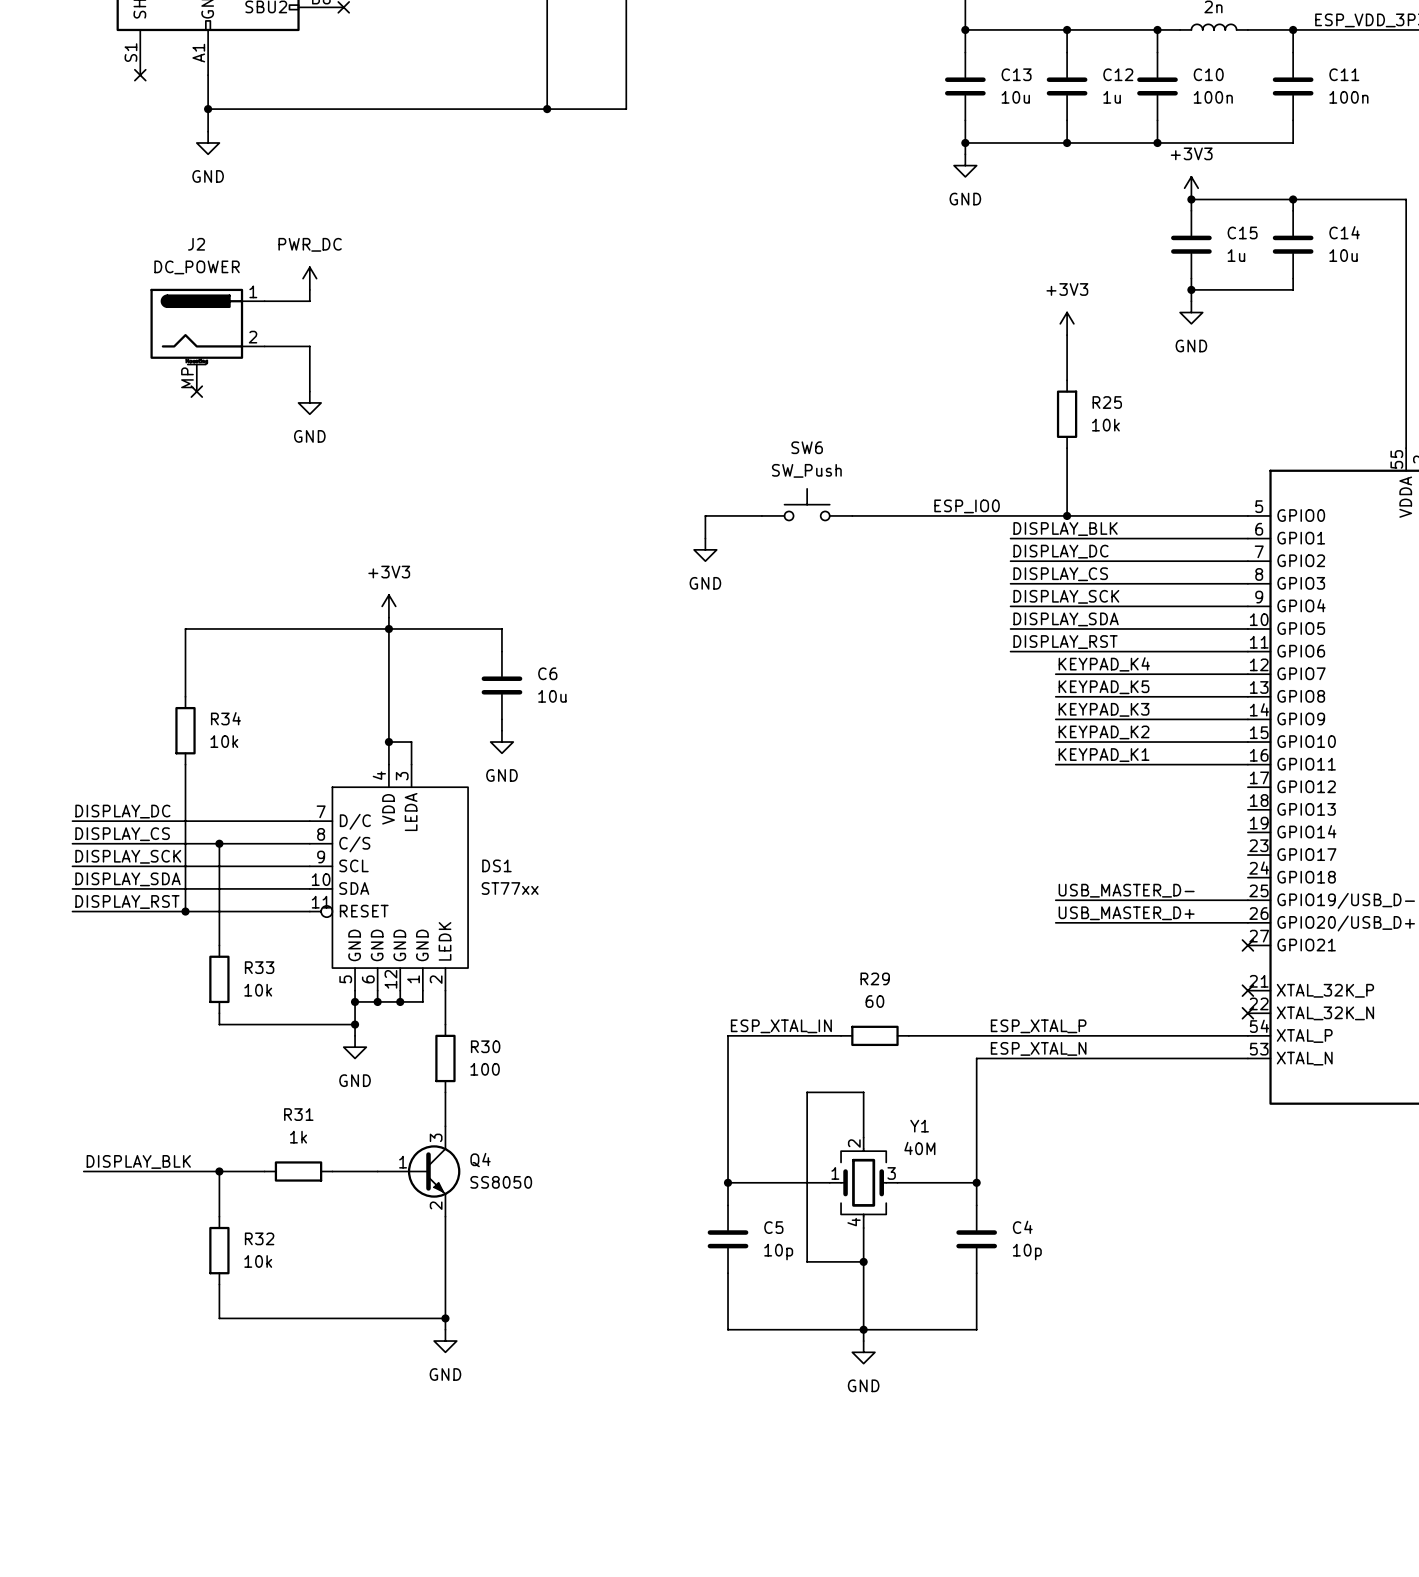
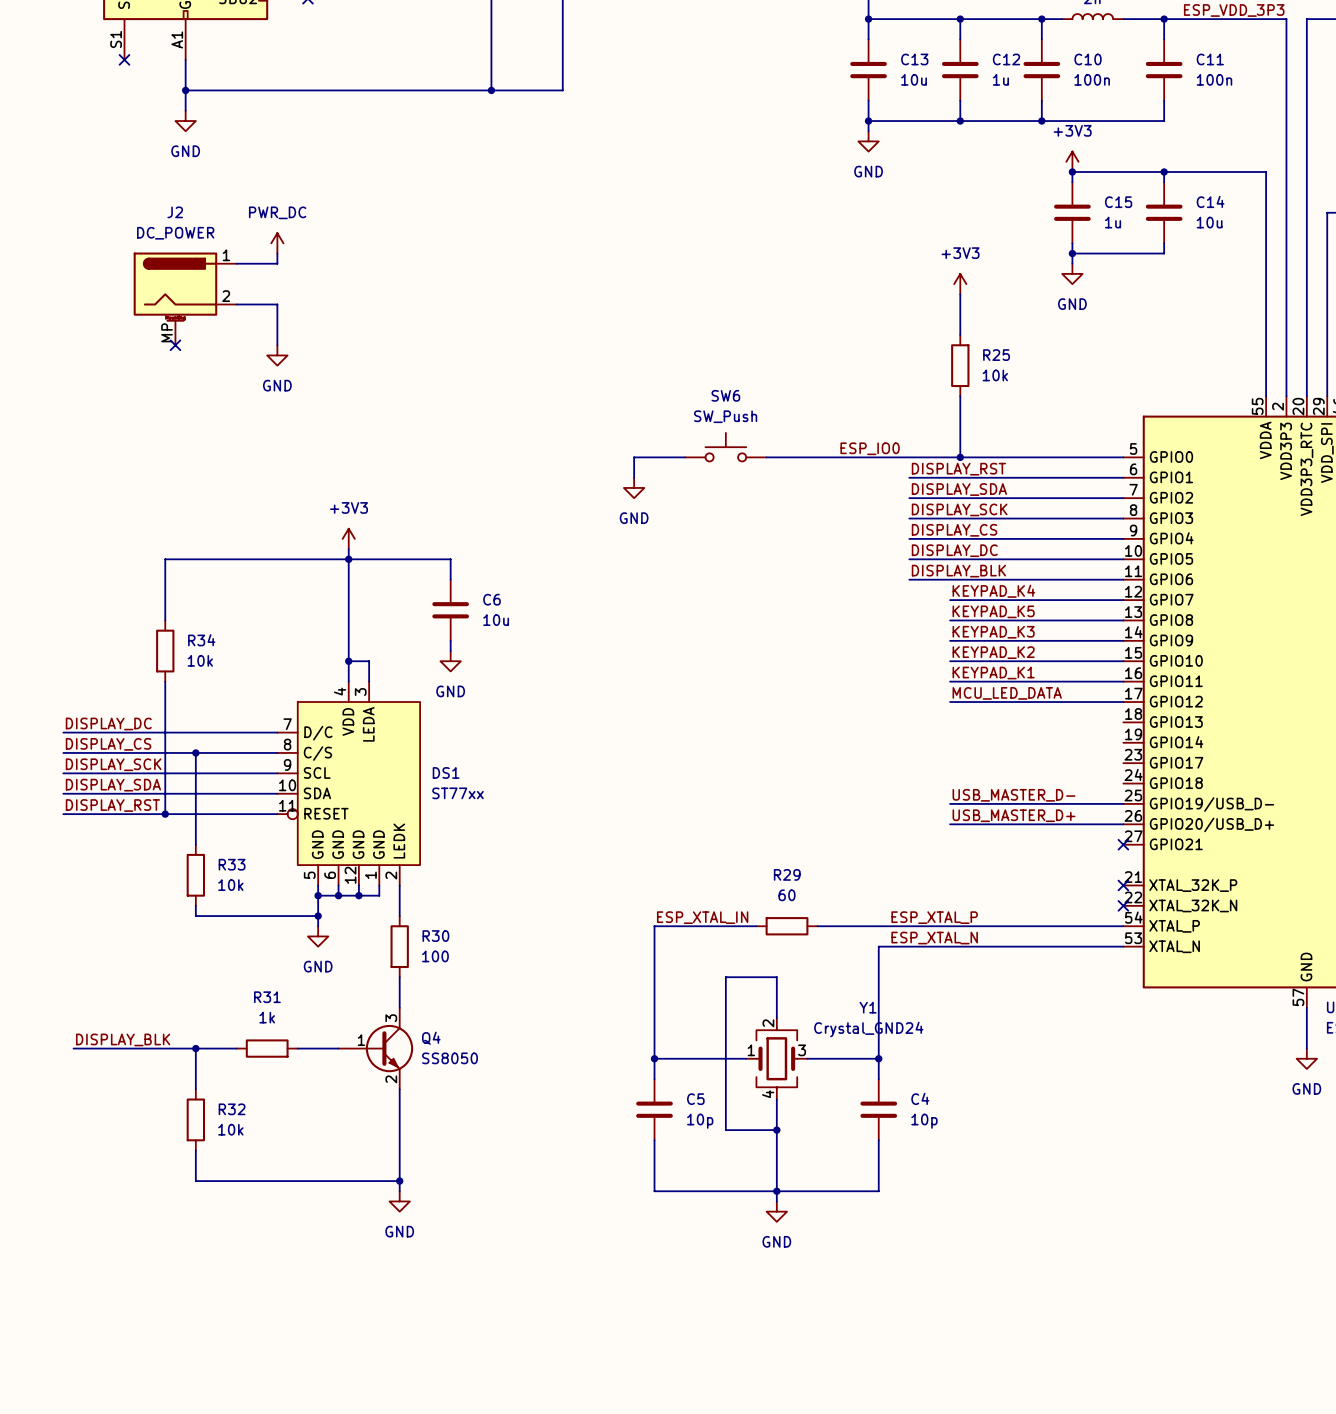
label: DISPLAY_BLK (1065, 529) -> DISPLAY_RST (958, 469)
label: DISPLAY_DC (1060, 551) -> DISPLAY_SDA (959, 489)
label: DISPLAY_CS (1060, 574) -> DISPLAY_SCK (959, 509)
label: DISPLAY_SCK (1066, 596) -> DISPLAY_CS (954, 530)
label: DISPLAY_SDA (1066, 619) -> DISPLAY_DC (954, 550)
label: DISPLAY_RST (1065, 642) -> DISPLAY_BLK (958, 571)
label: none -> MCU_LED_DATA (1007, 693)
wire: none -> (950, 702) (1123, 702)
Y1 name position: Y1 (919, 1126) -> Y1 (868, 1007)
Y1 value: 40M (919, 1148) -> Crystal_GND24 (868, 1029)

